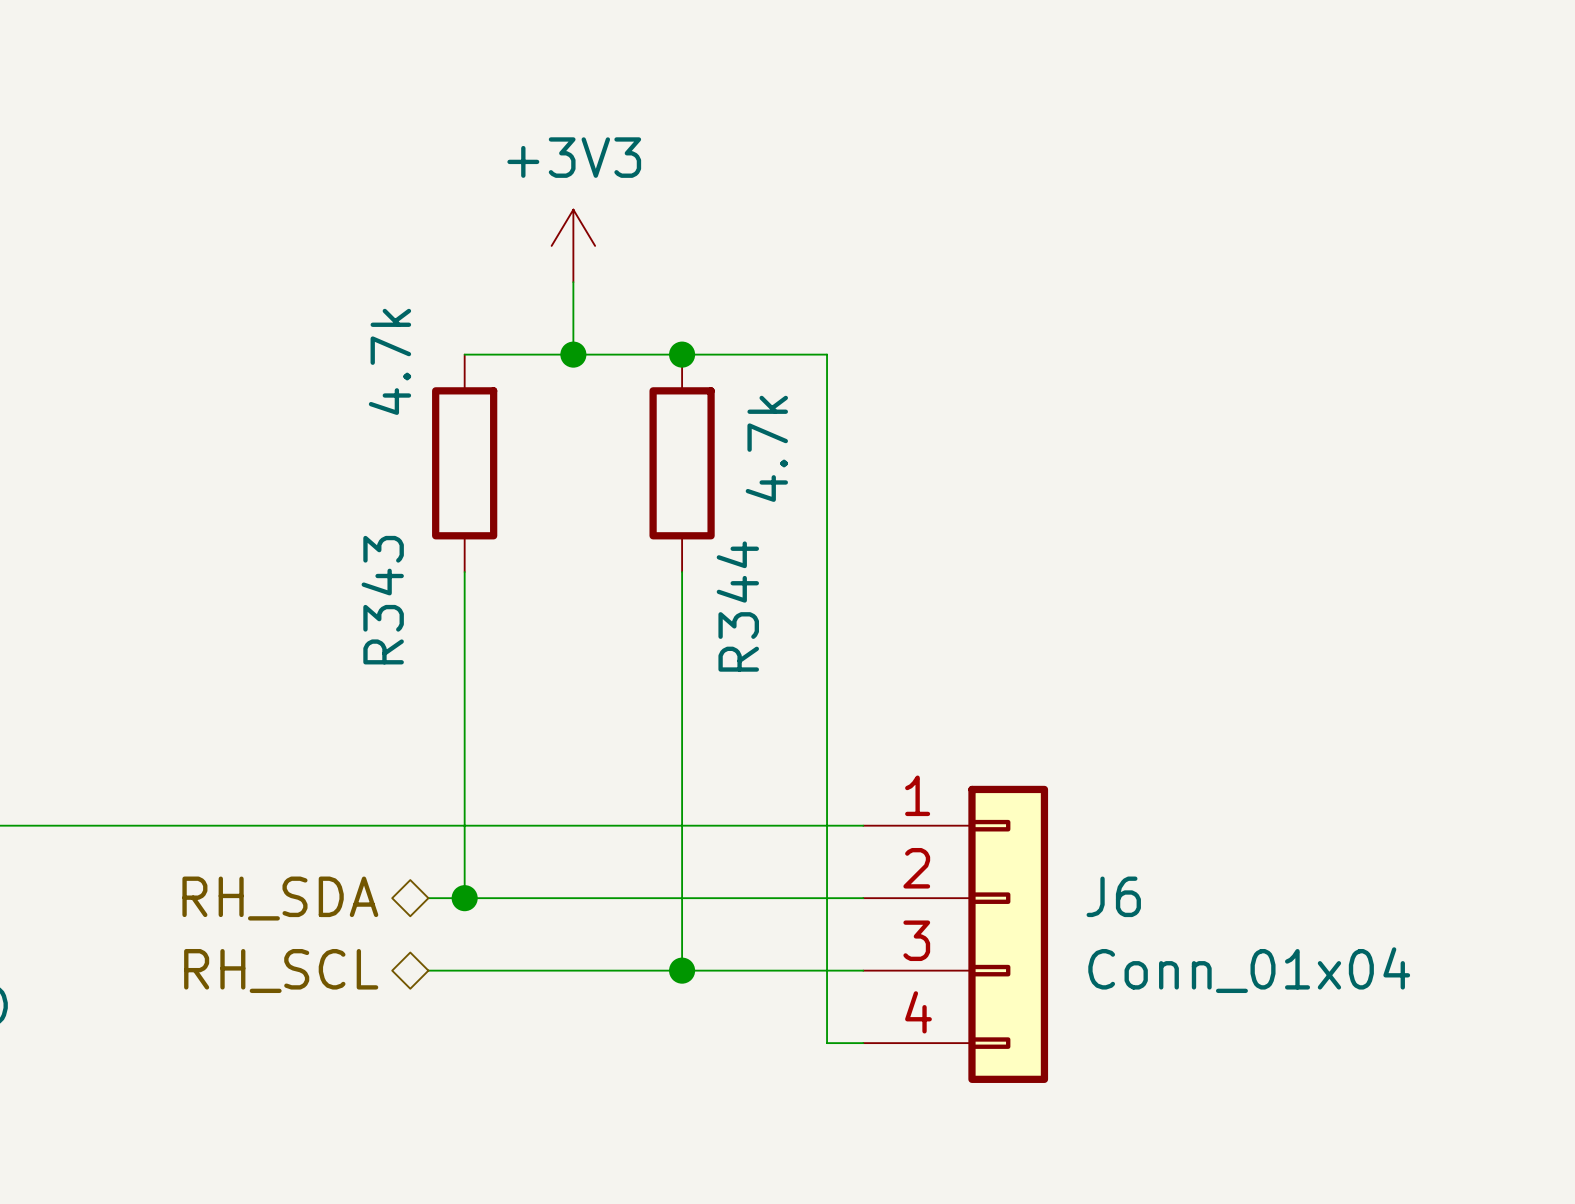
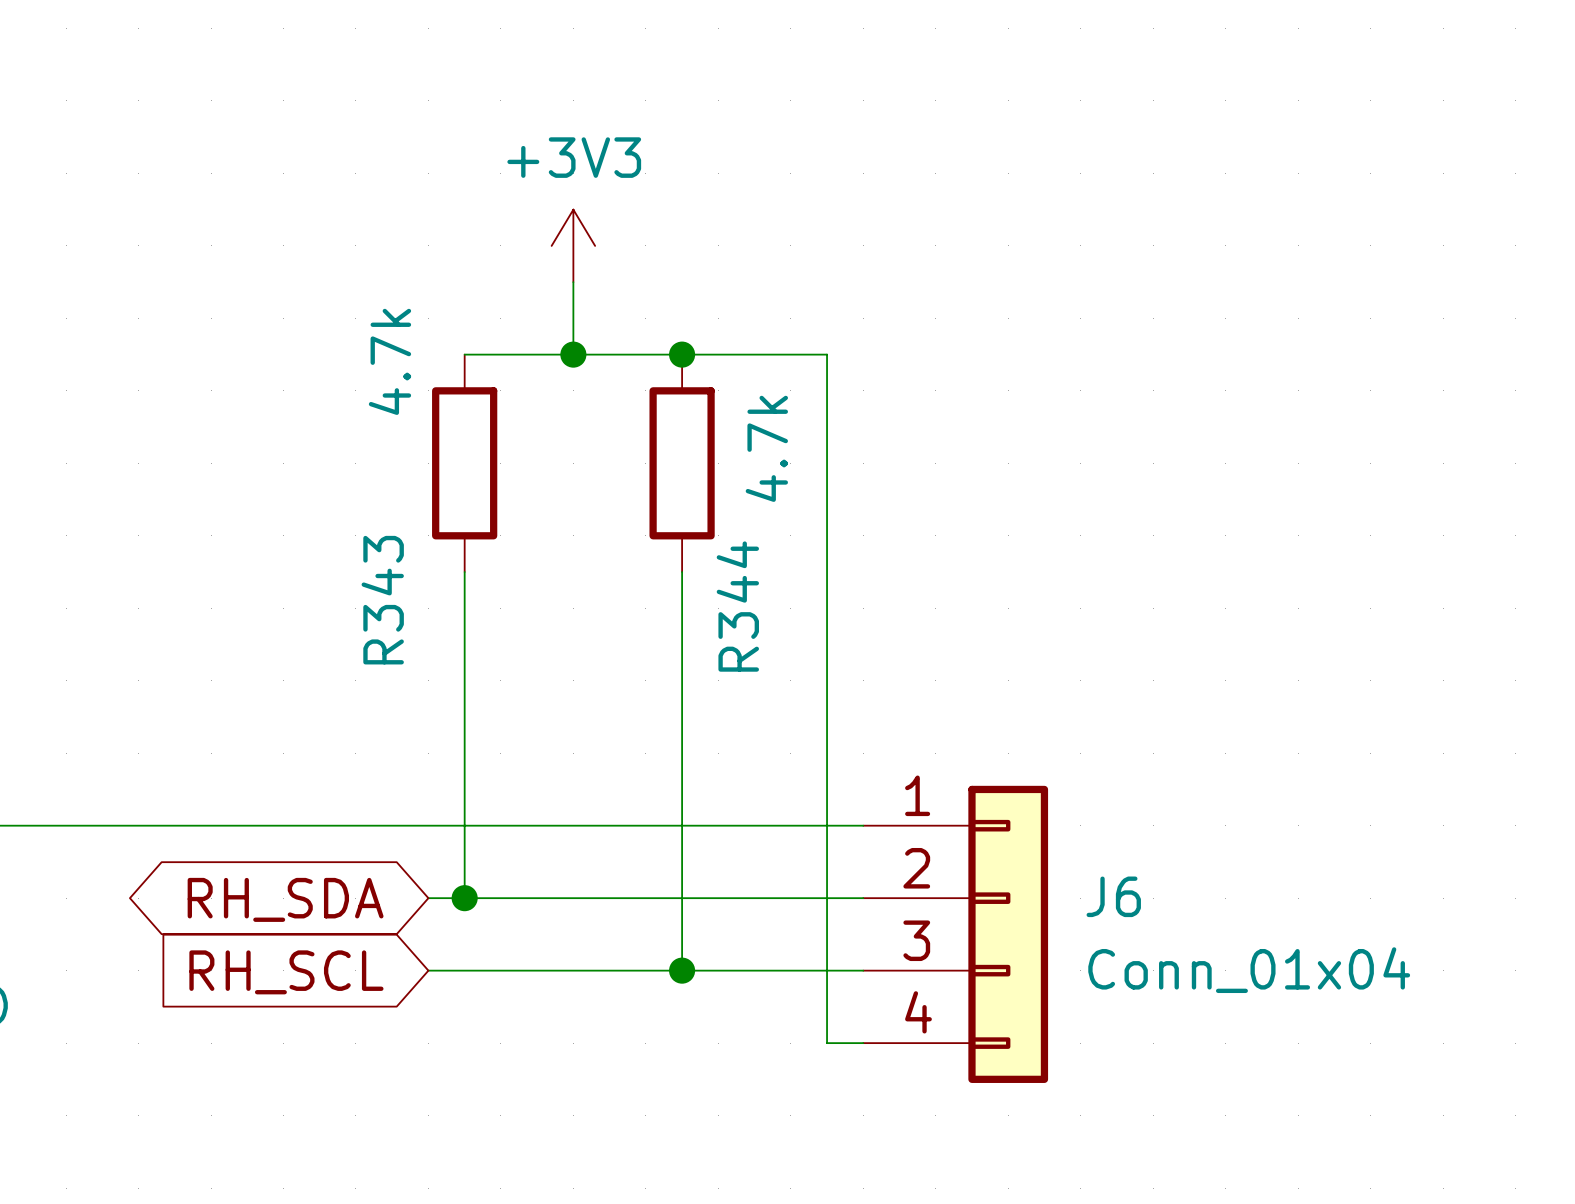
hierarchical label: RH_SDA (280, 898) -> none
global label: none -> RH_SDA (285, 899)
hierarchical label: RH_SCL (281, 971) -> none
global label: none -> RH_SCL (286, 972)

